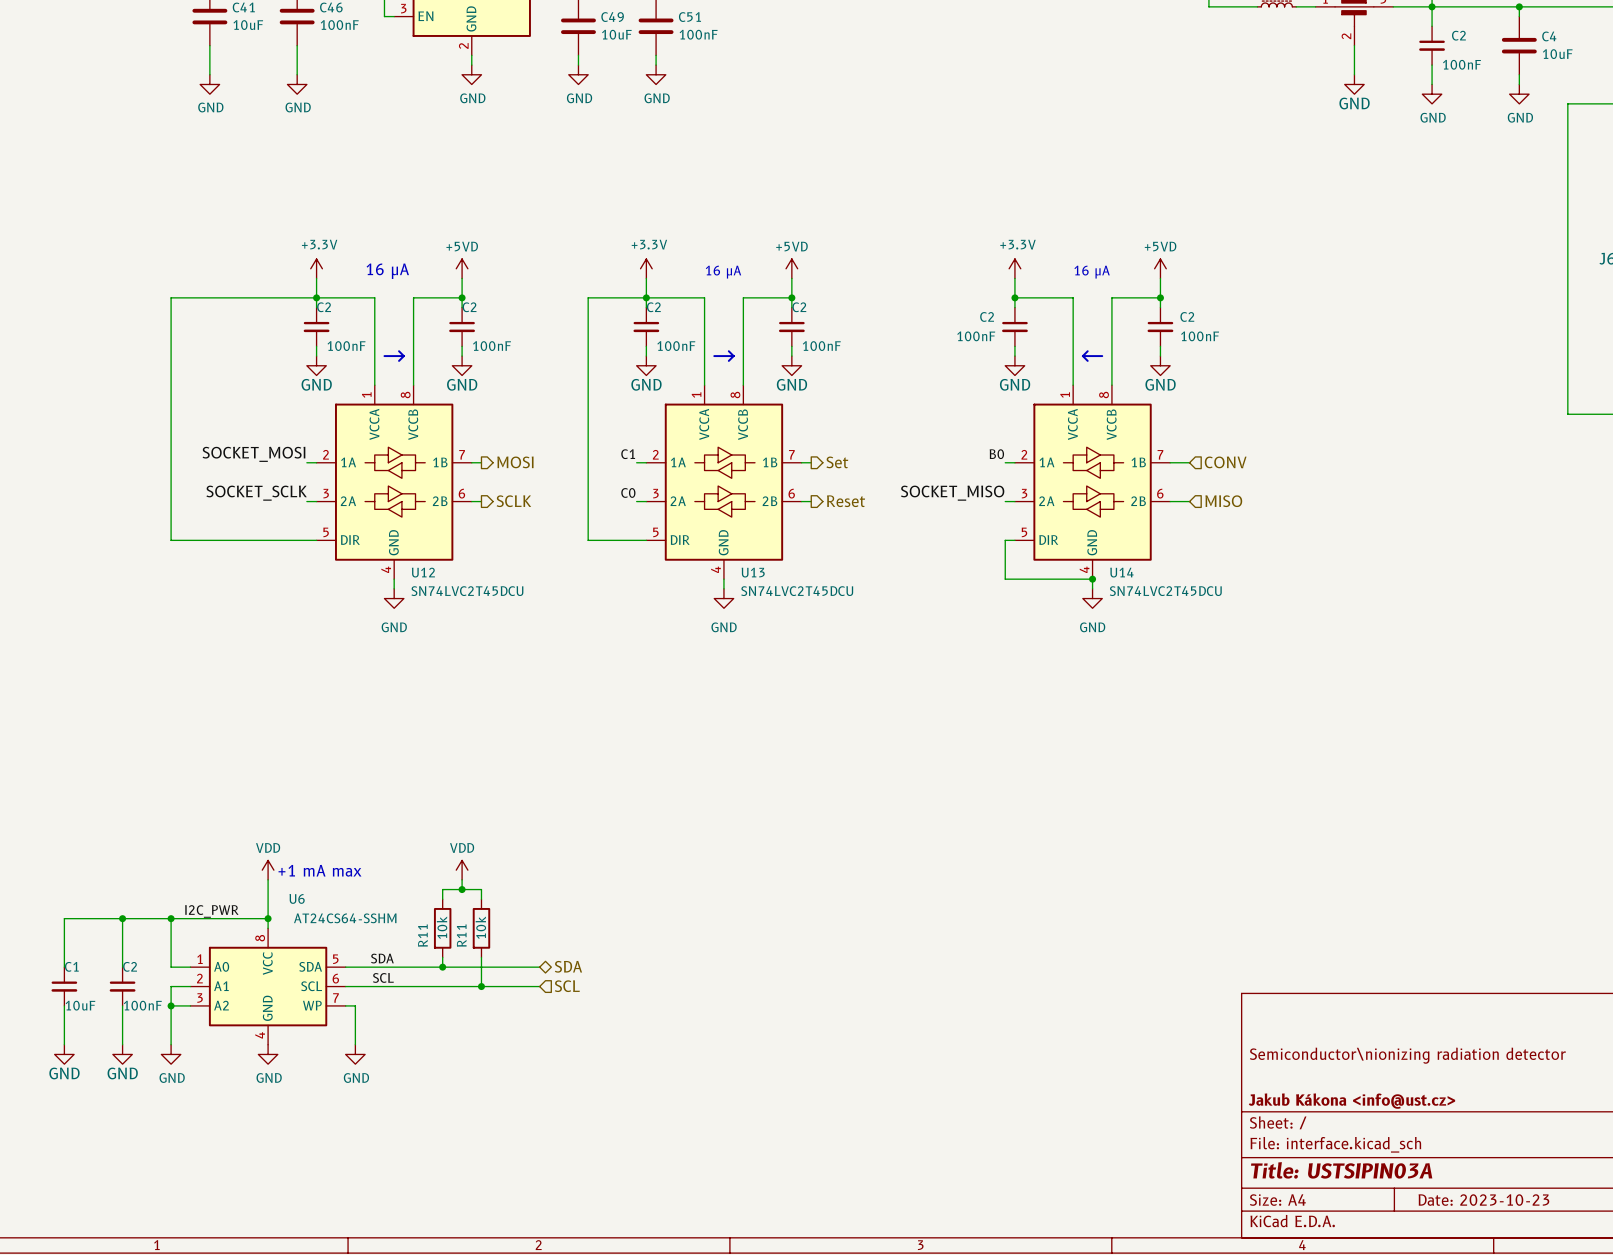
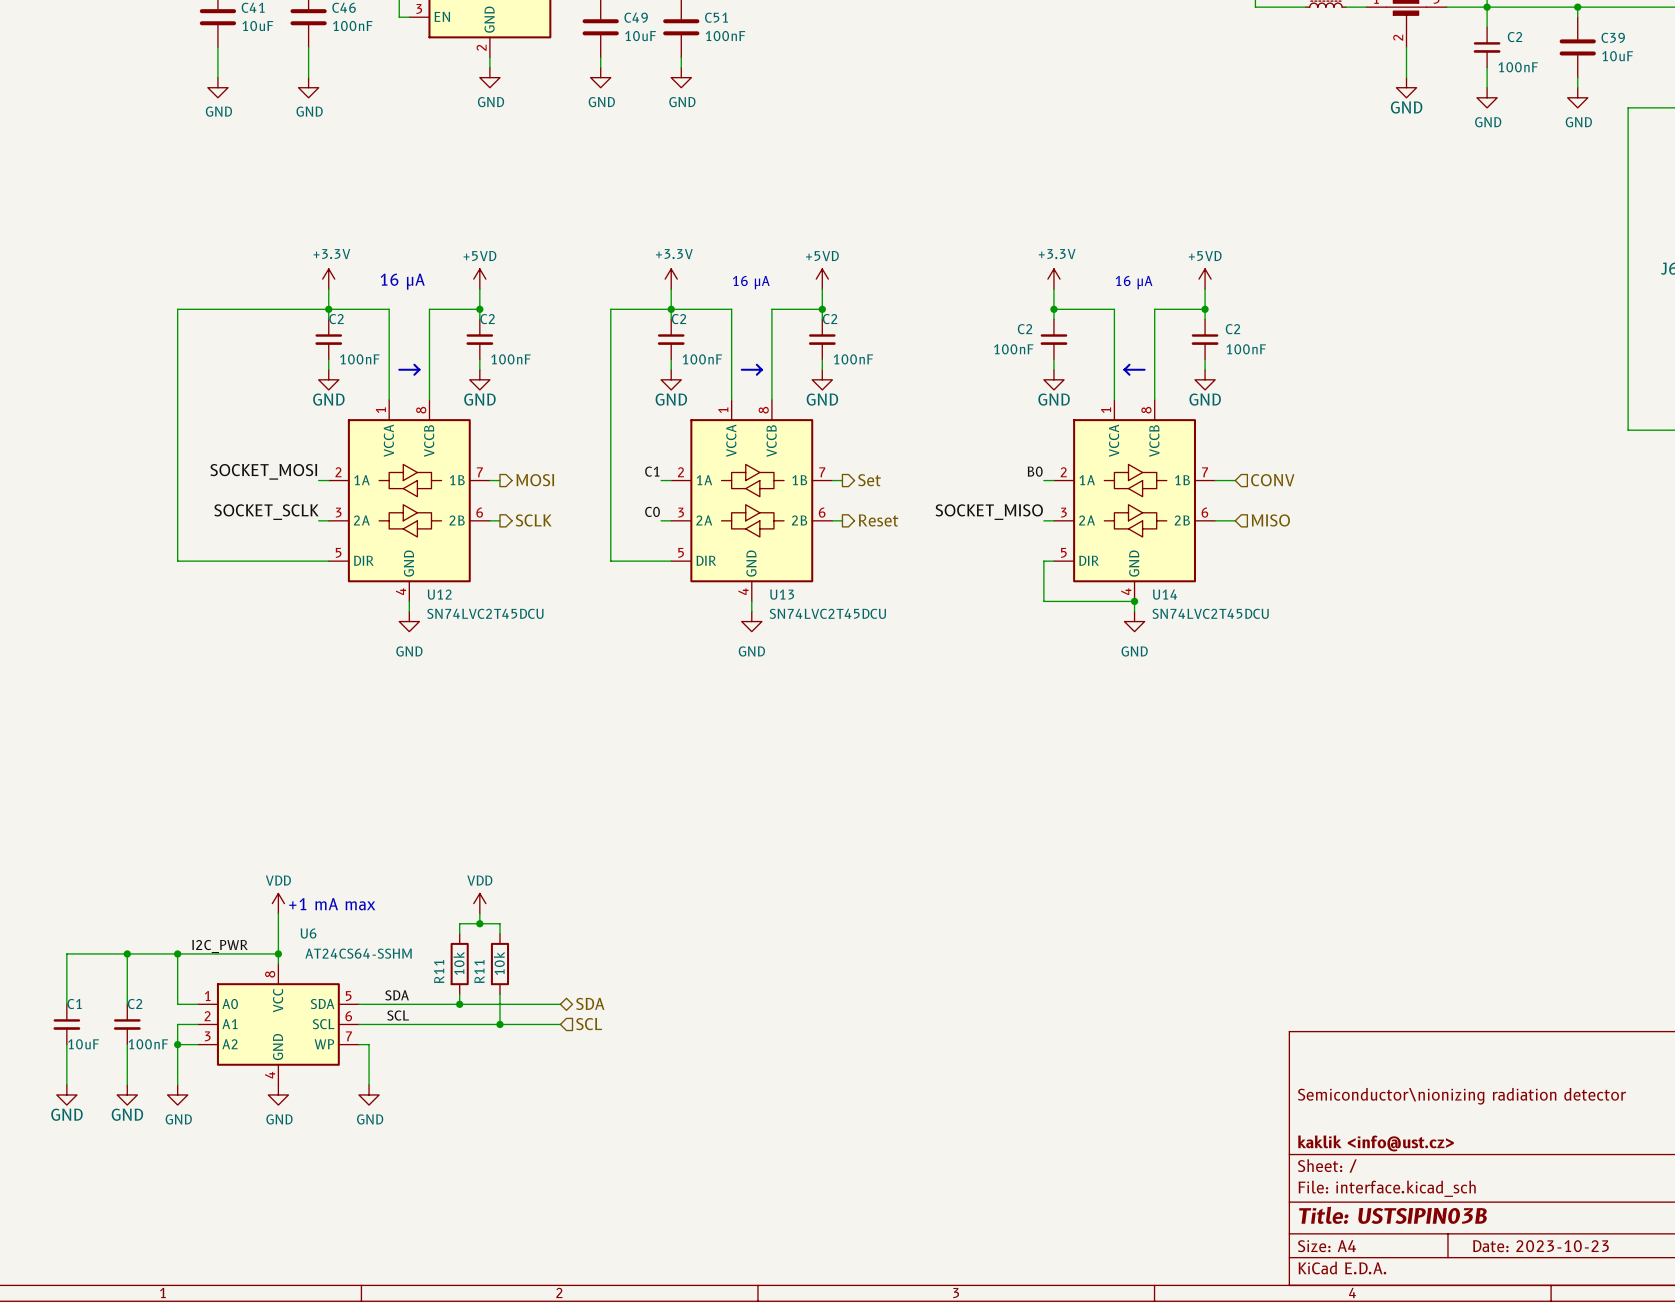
C4 name: C4 (1549, 36) -> C39 (1613, 37)
title block: Jakub Kákona <info@ust.cz> (1351, 1101) -> kaklik <info@ust.cz> (1375, 1143)
title block: Title: USTSIPIN03A (1341, 1170) -> Title: USTSIPIN03B (1392, 1215)

